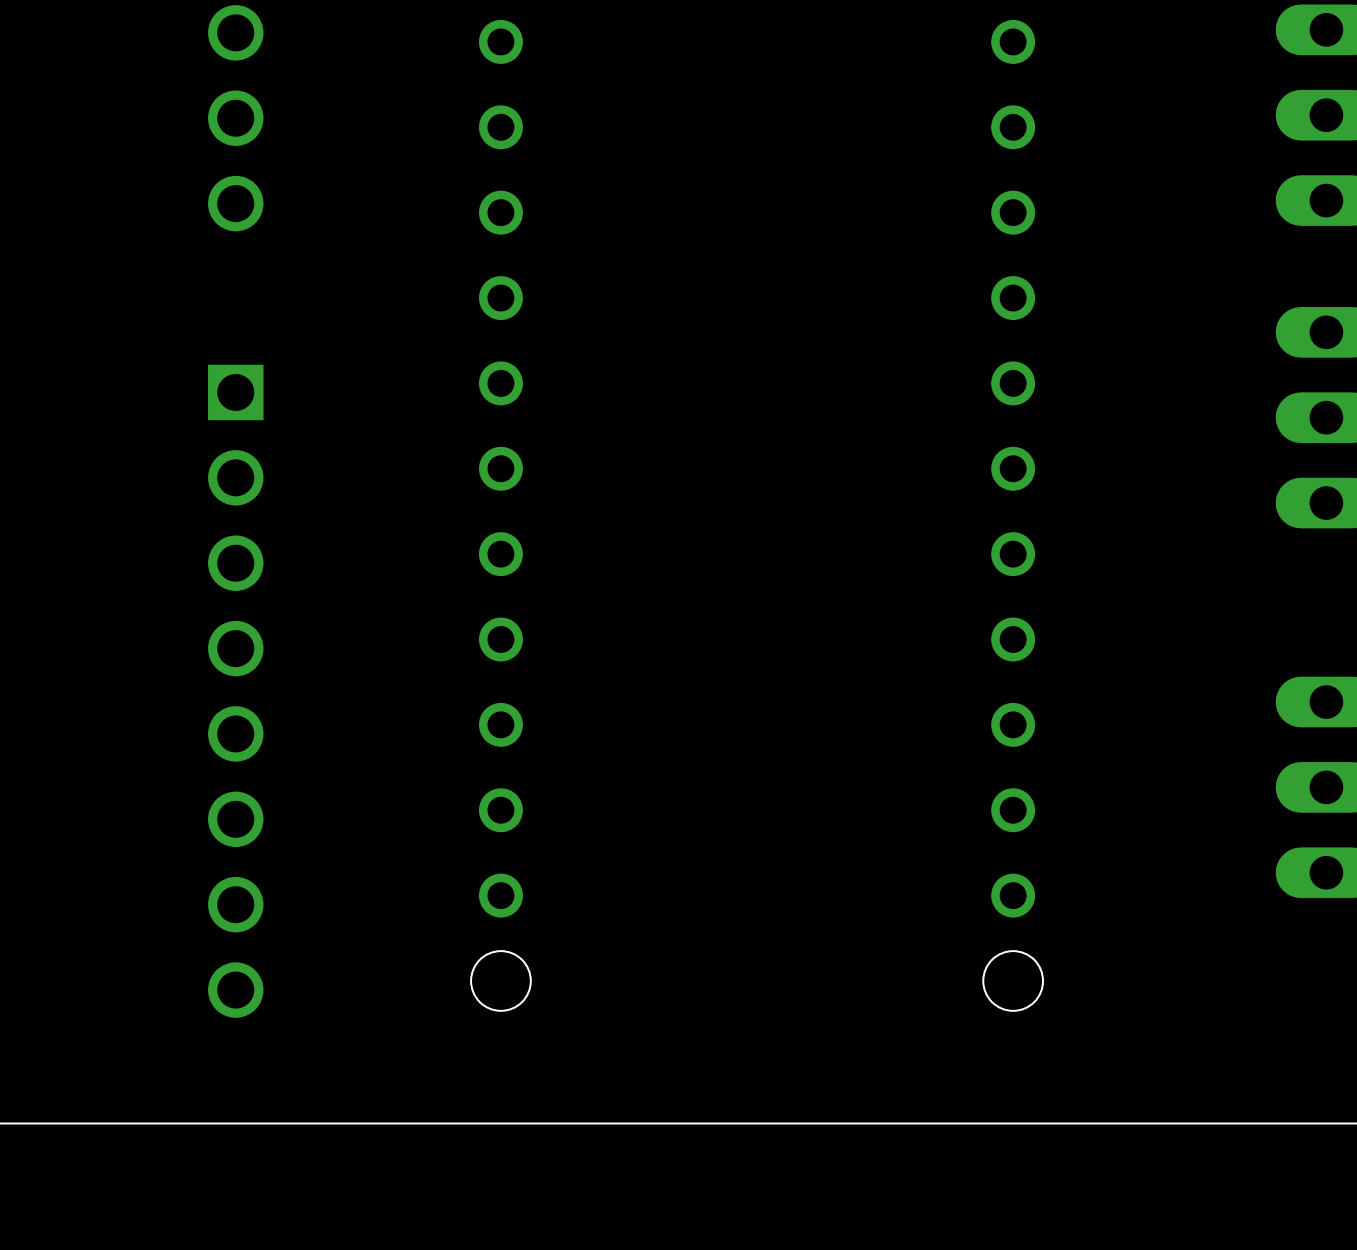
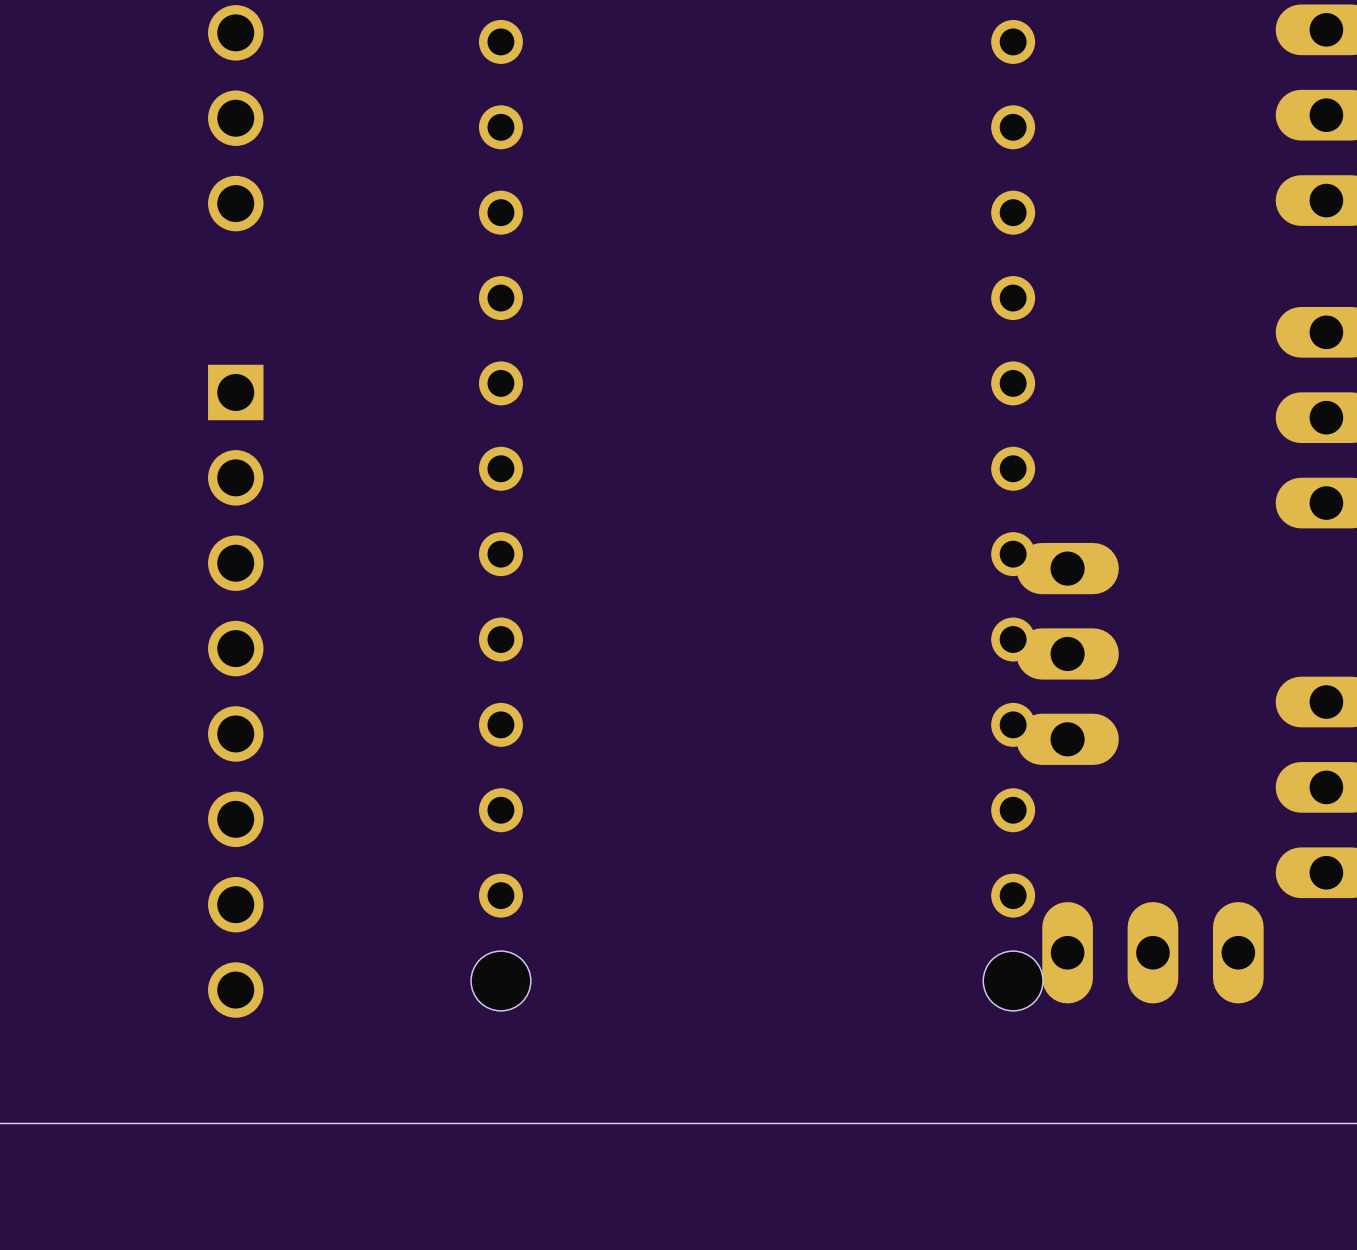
part: none -> (1067, 653)
part: none -> (1152, 952)

